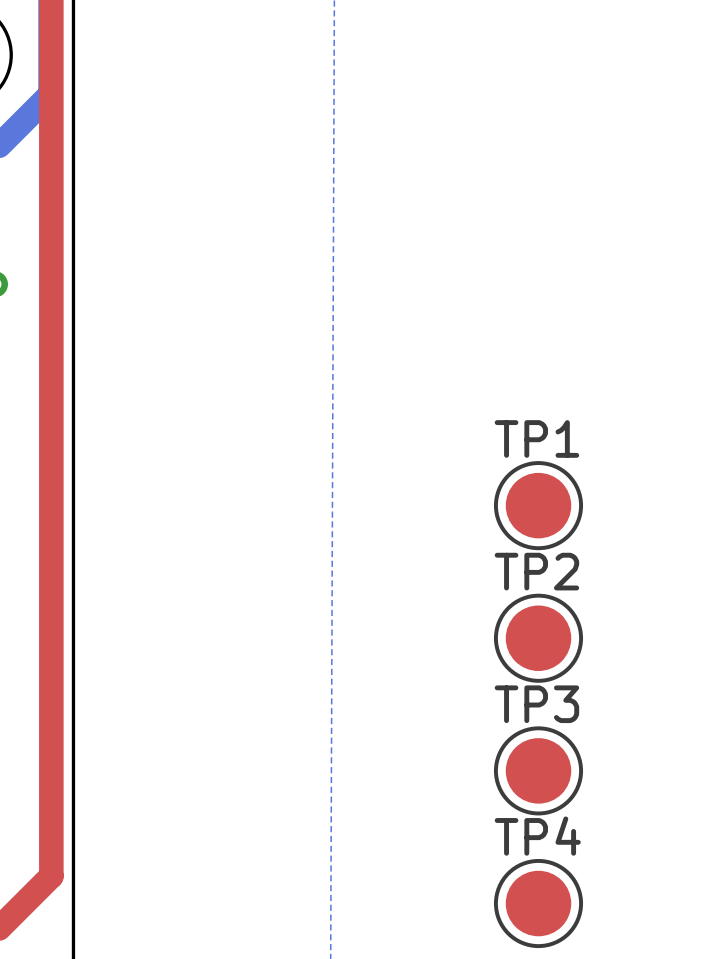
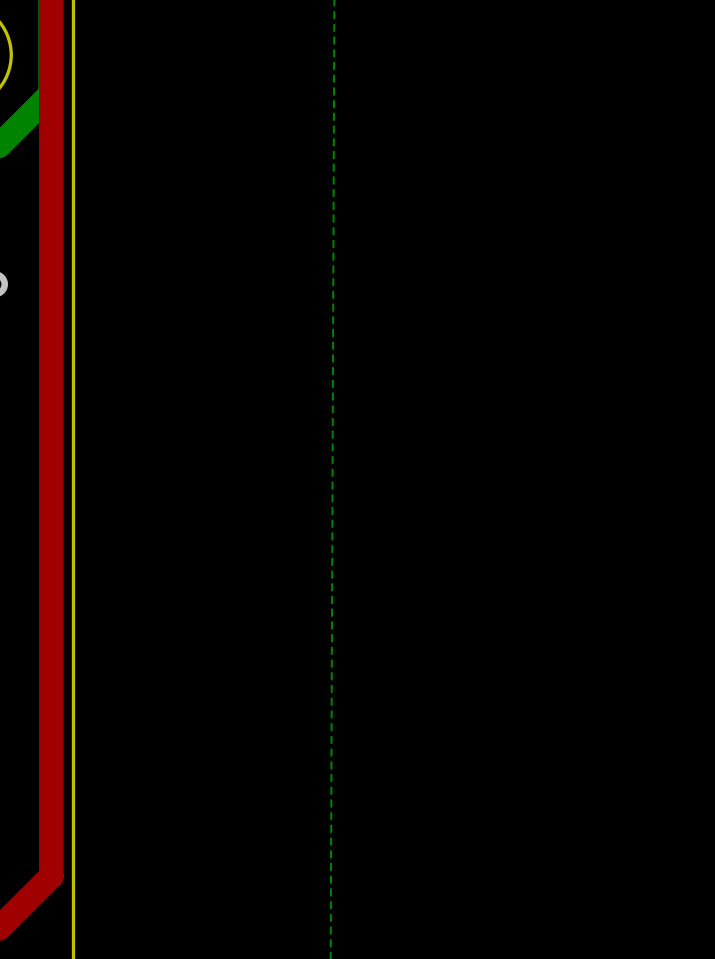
TP1: (538, 505) -> none
TP2: (538, 638) -> none
TP3: (538, 770) -> none
TP4: (538, 903) -> none

